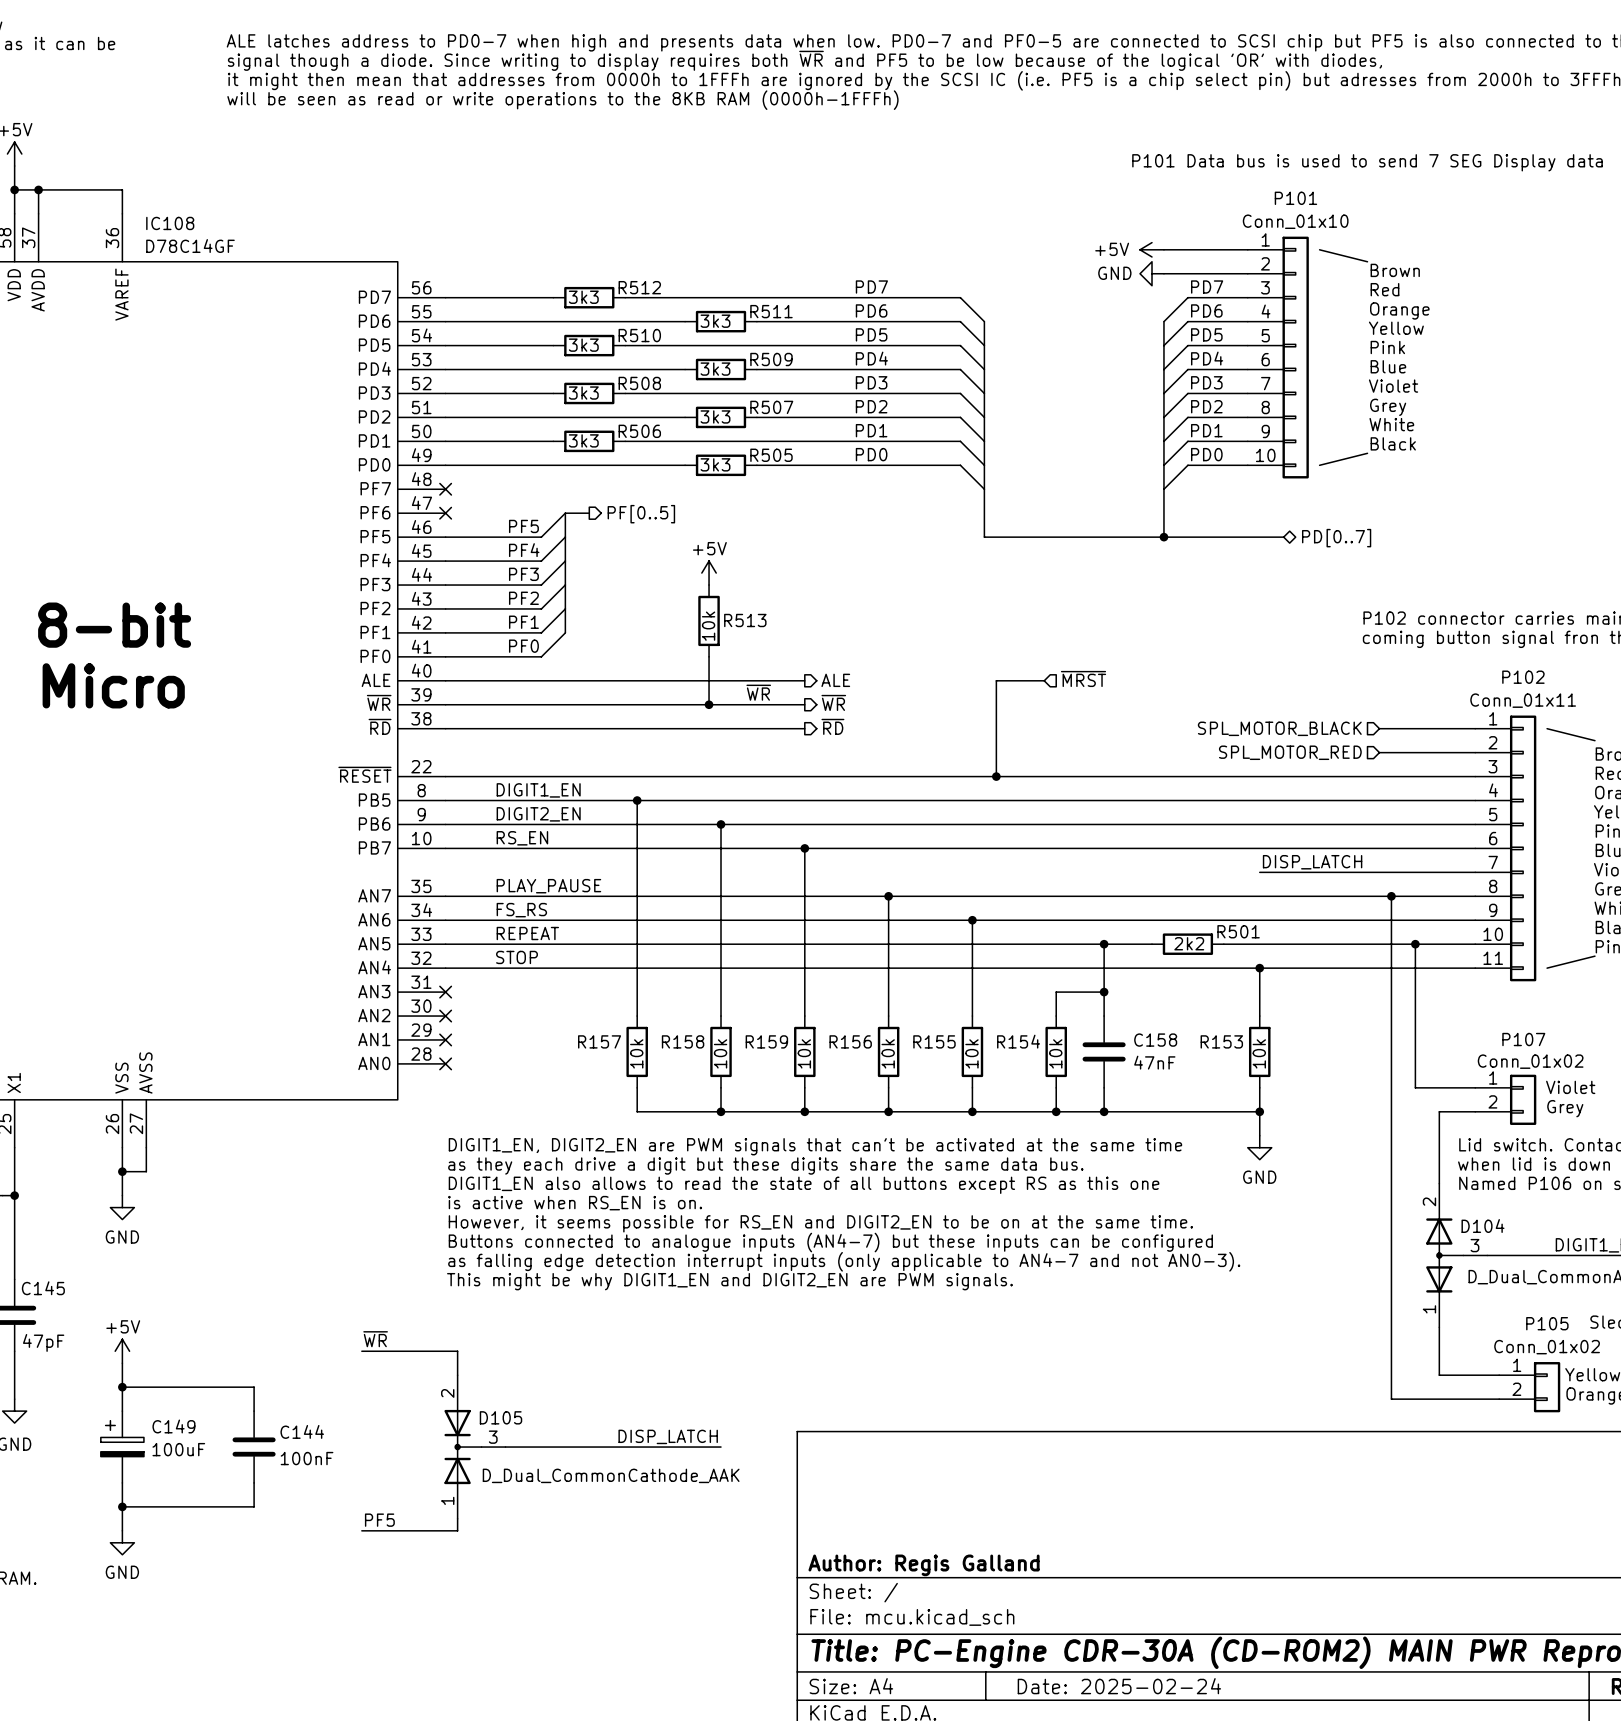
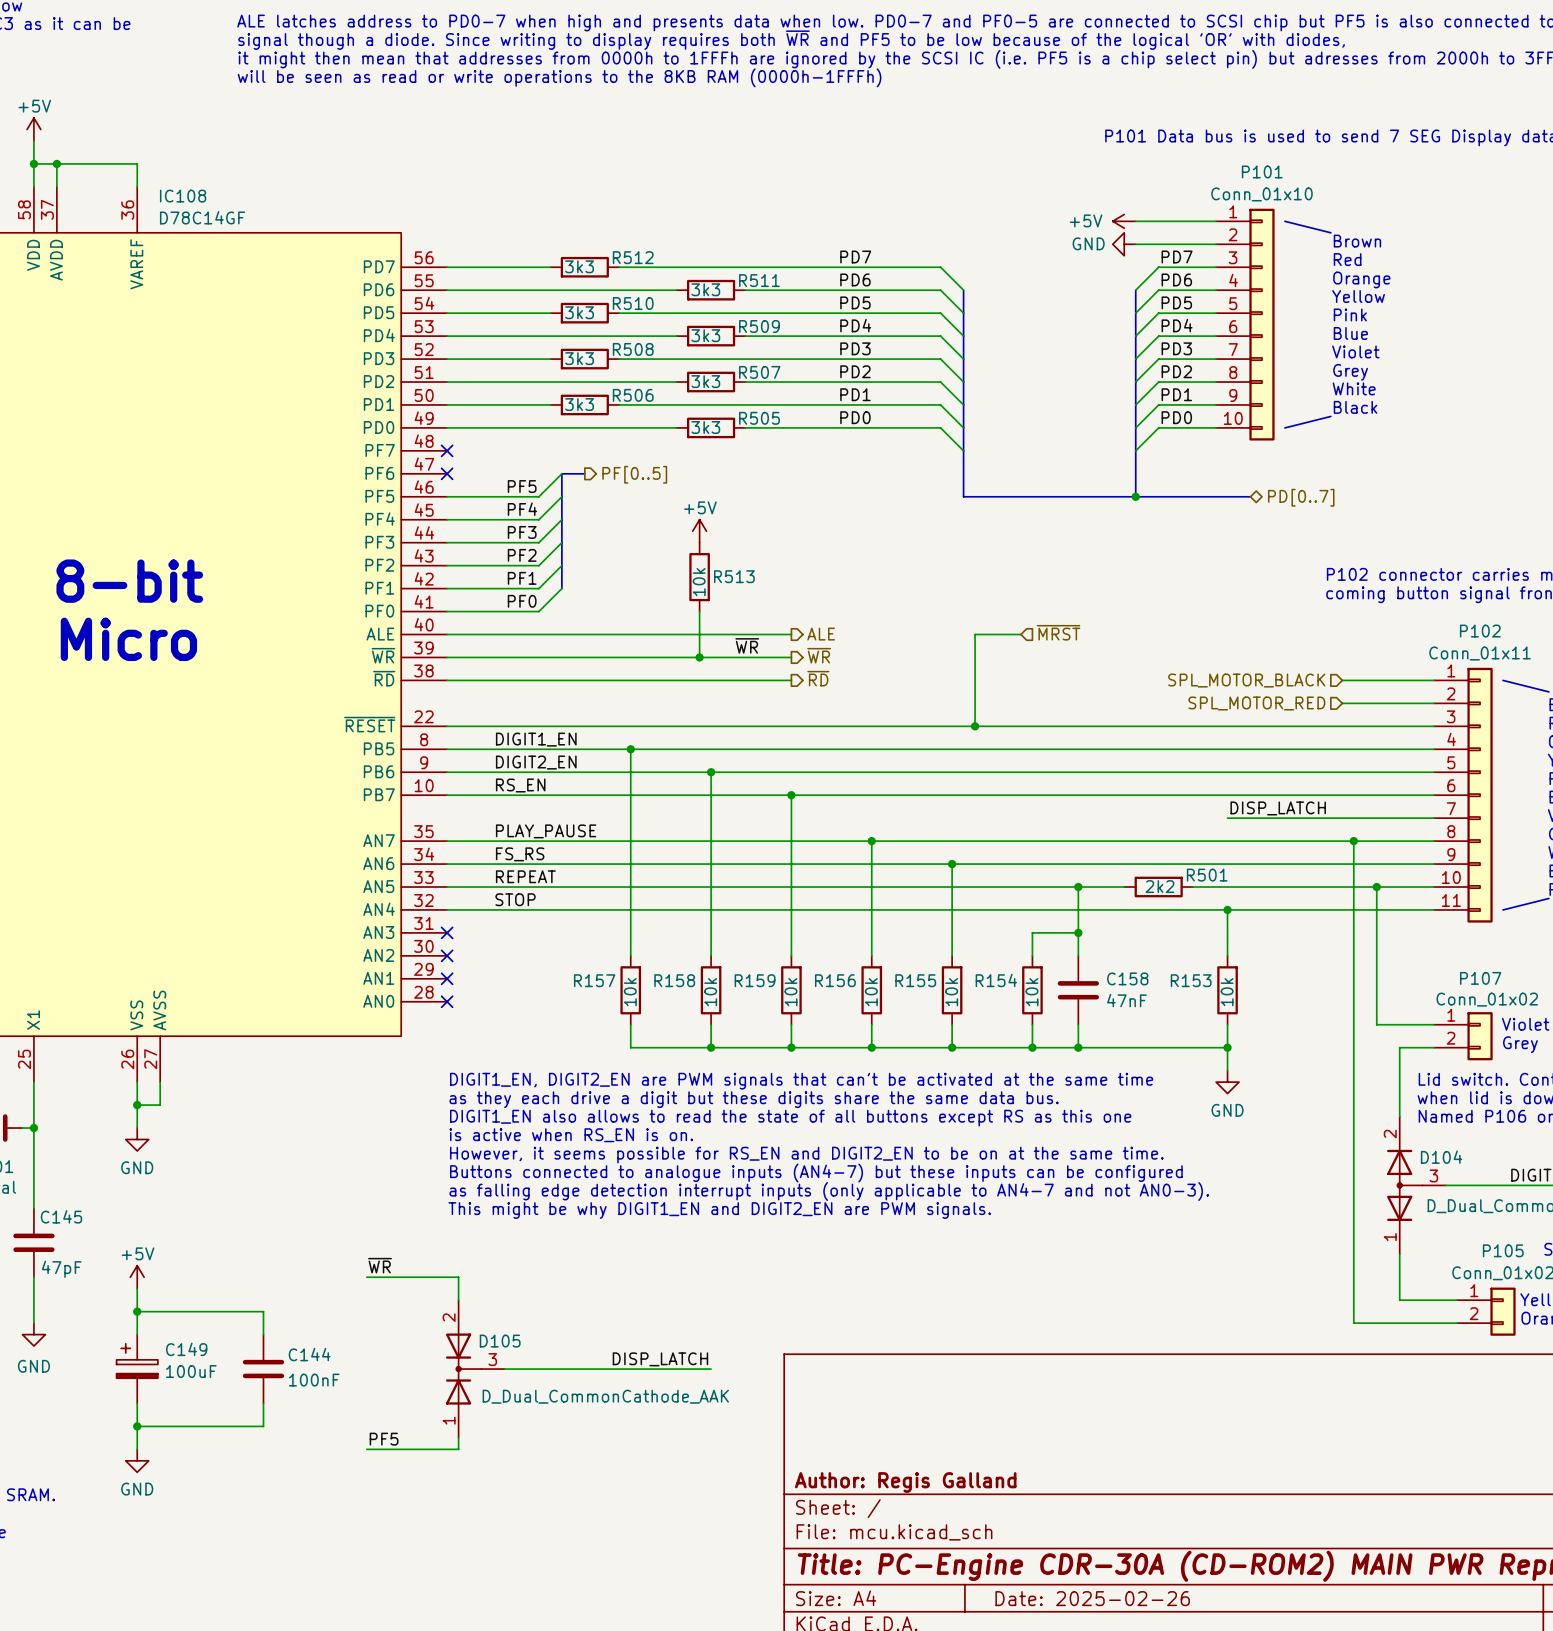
title block: Date: 2025-02-24 (1119, 1686) -> Date: 2025-02-26 (1092, 1598)

